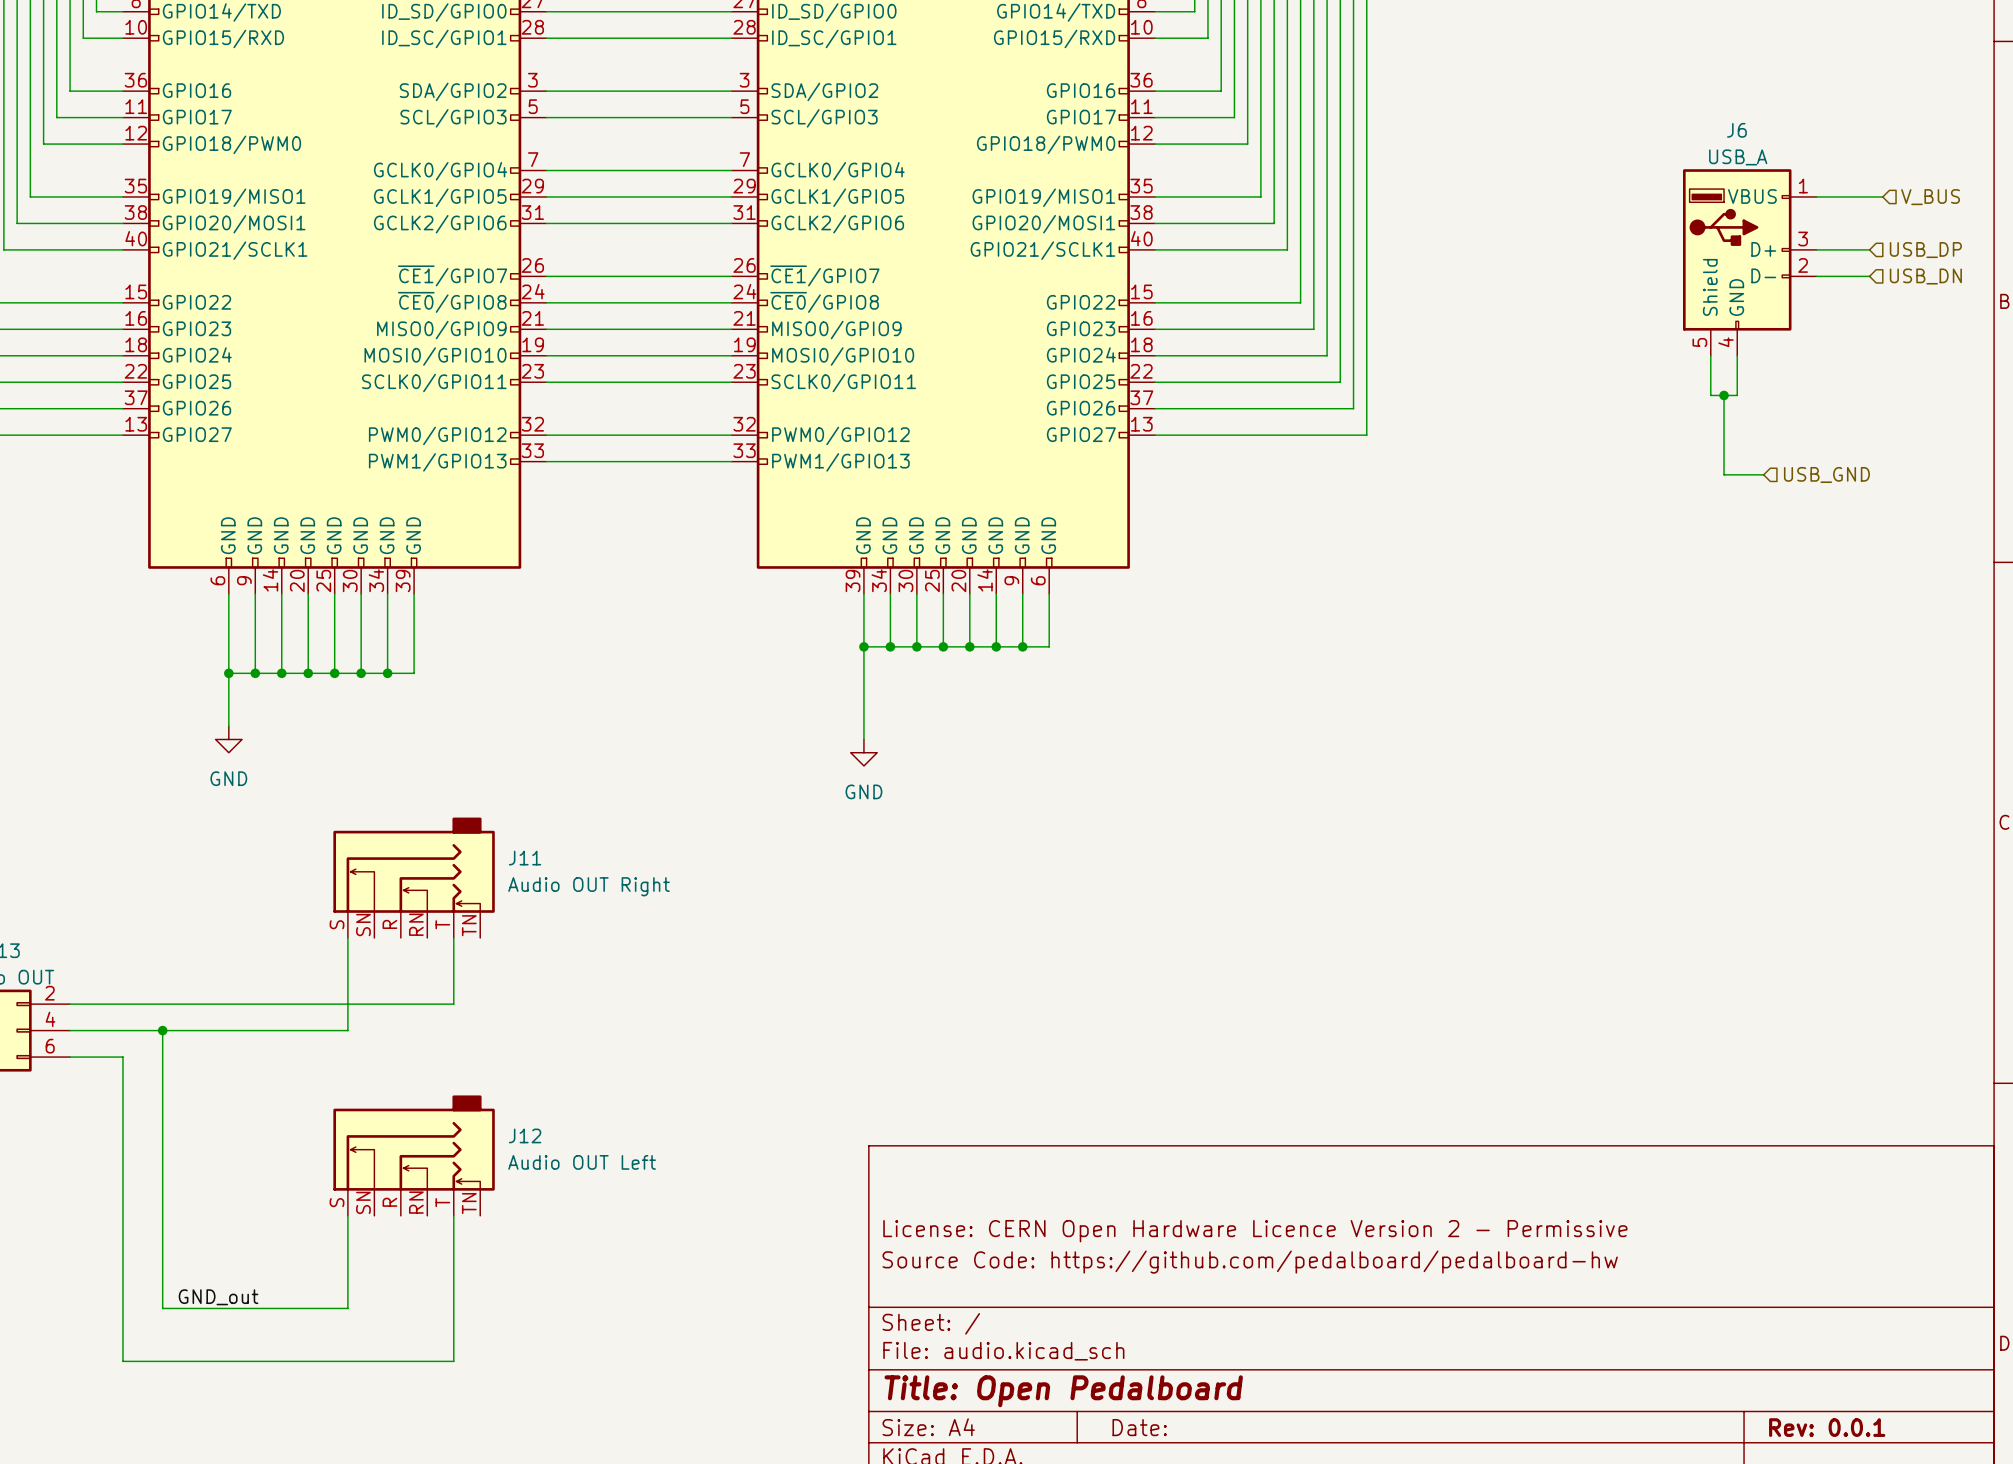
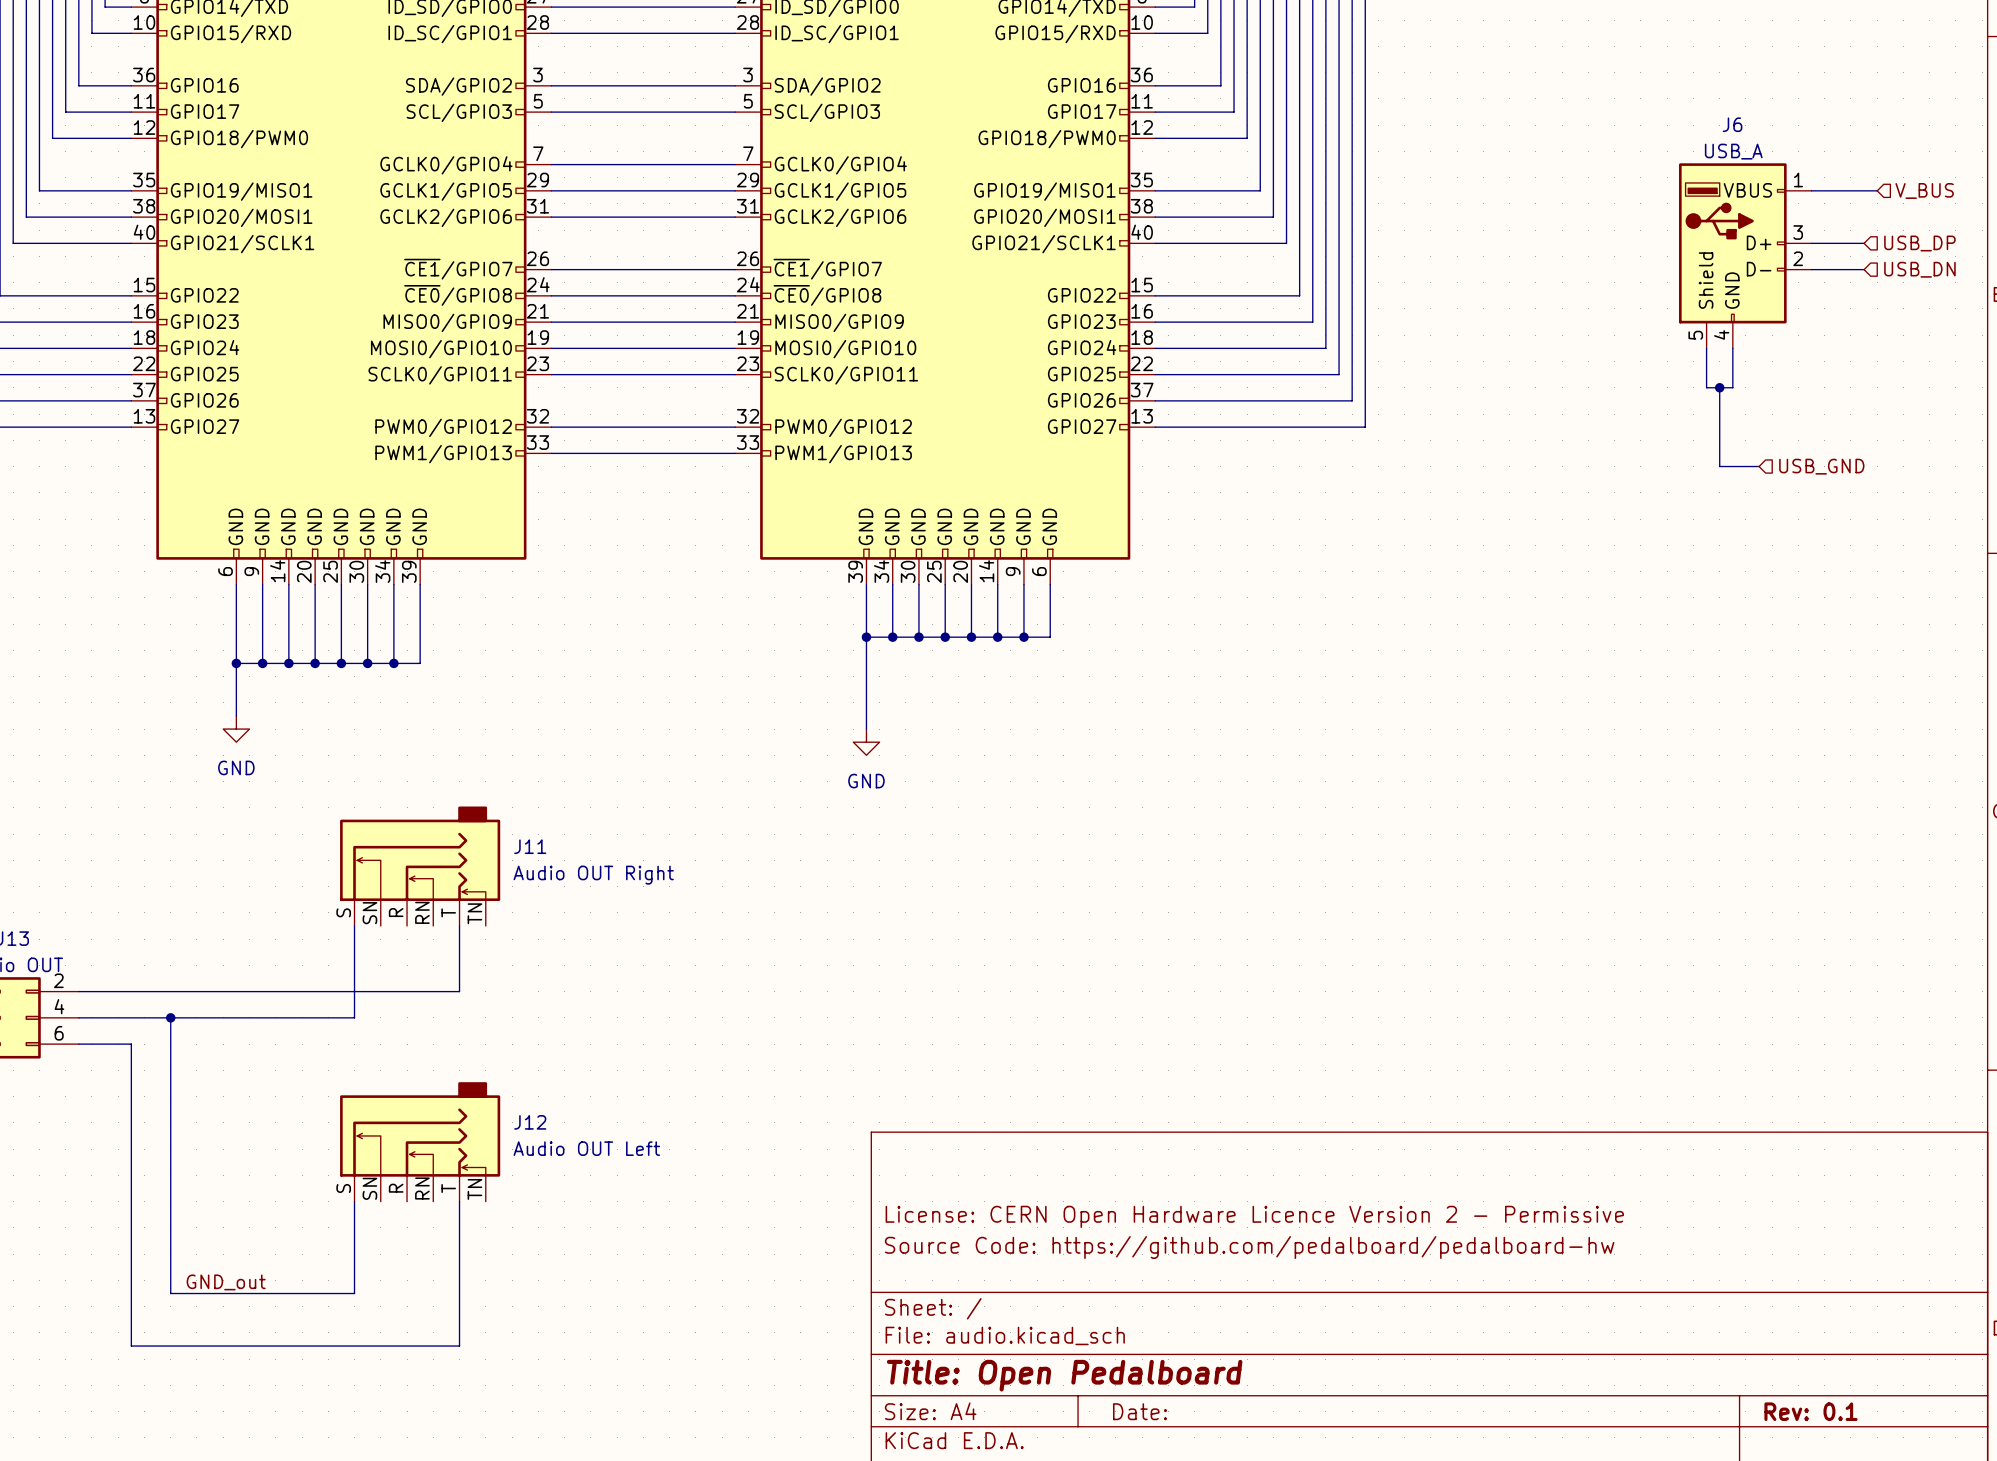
title block: Rev: 0.0.1 (1827, 1427) -> Rev: 0.1 (1810, 1411)

